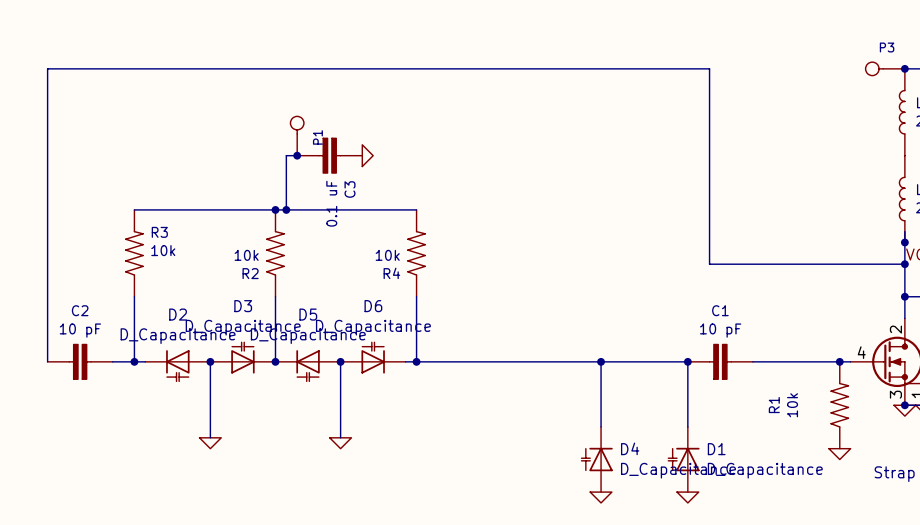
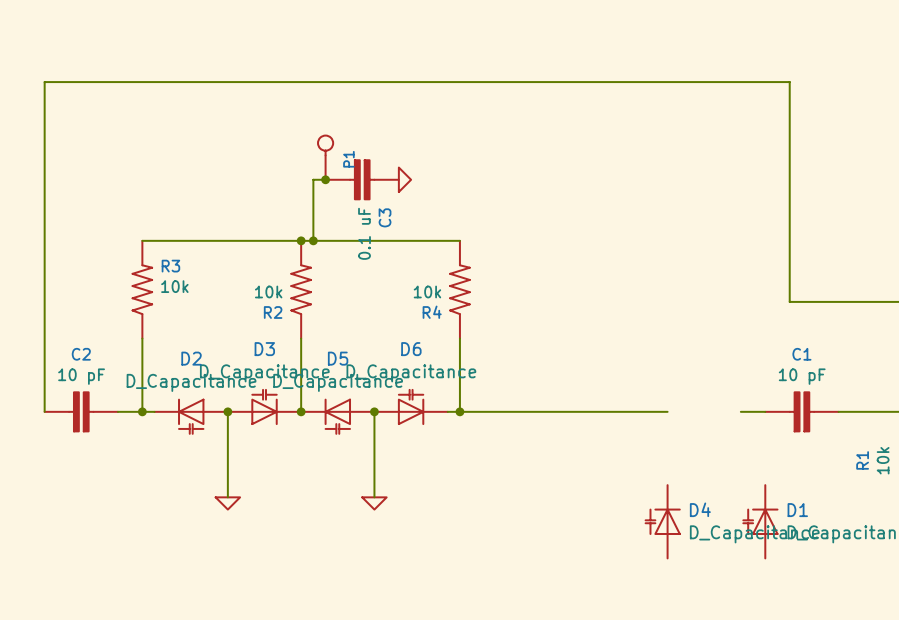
junction: (601, 361) -> none
wire: (666, 361) (601, 361) (601, 426) -> none
wire: (687, 361) (687, 426) -> none
junction: (687, 361) -> none
power symbol: (601, 497) -> none
power symbol: (687, 497) -> none

